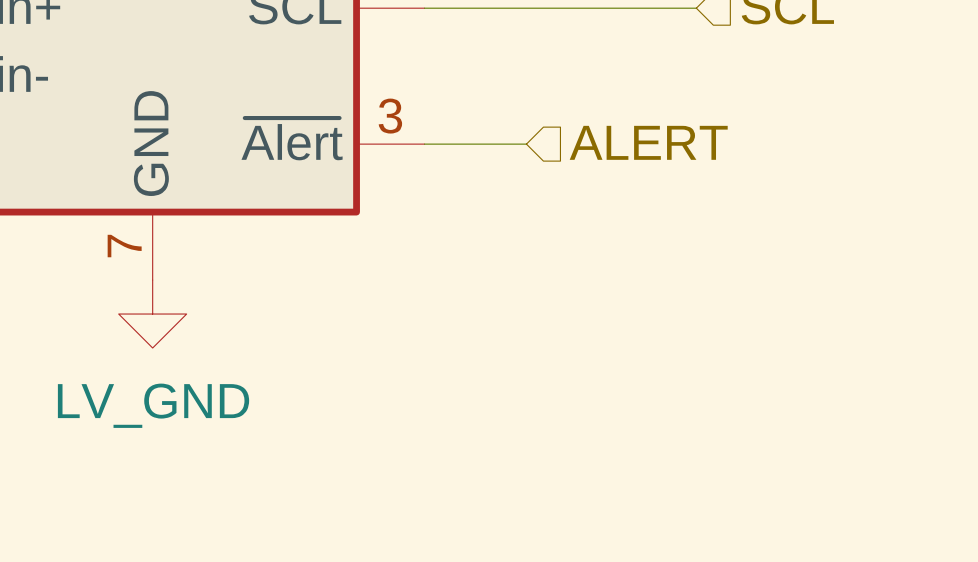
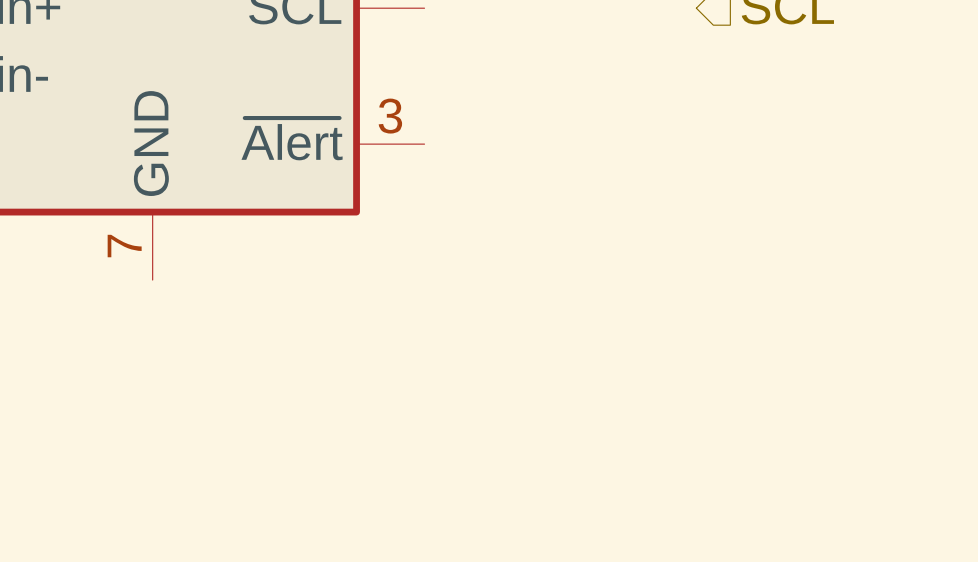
wire: (424, 8) (696, 8) -> none
hierarchical label: ALERT (648, 142) -> none
wire: (424, 144) (526, 144) -> none
power symbol: LV_GND (152, 314) -> none

